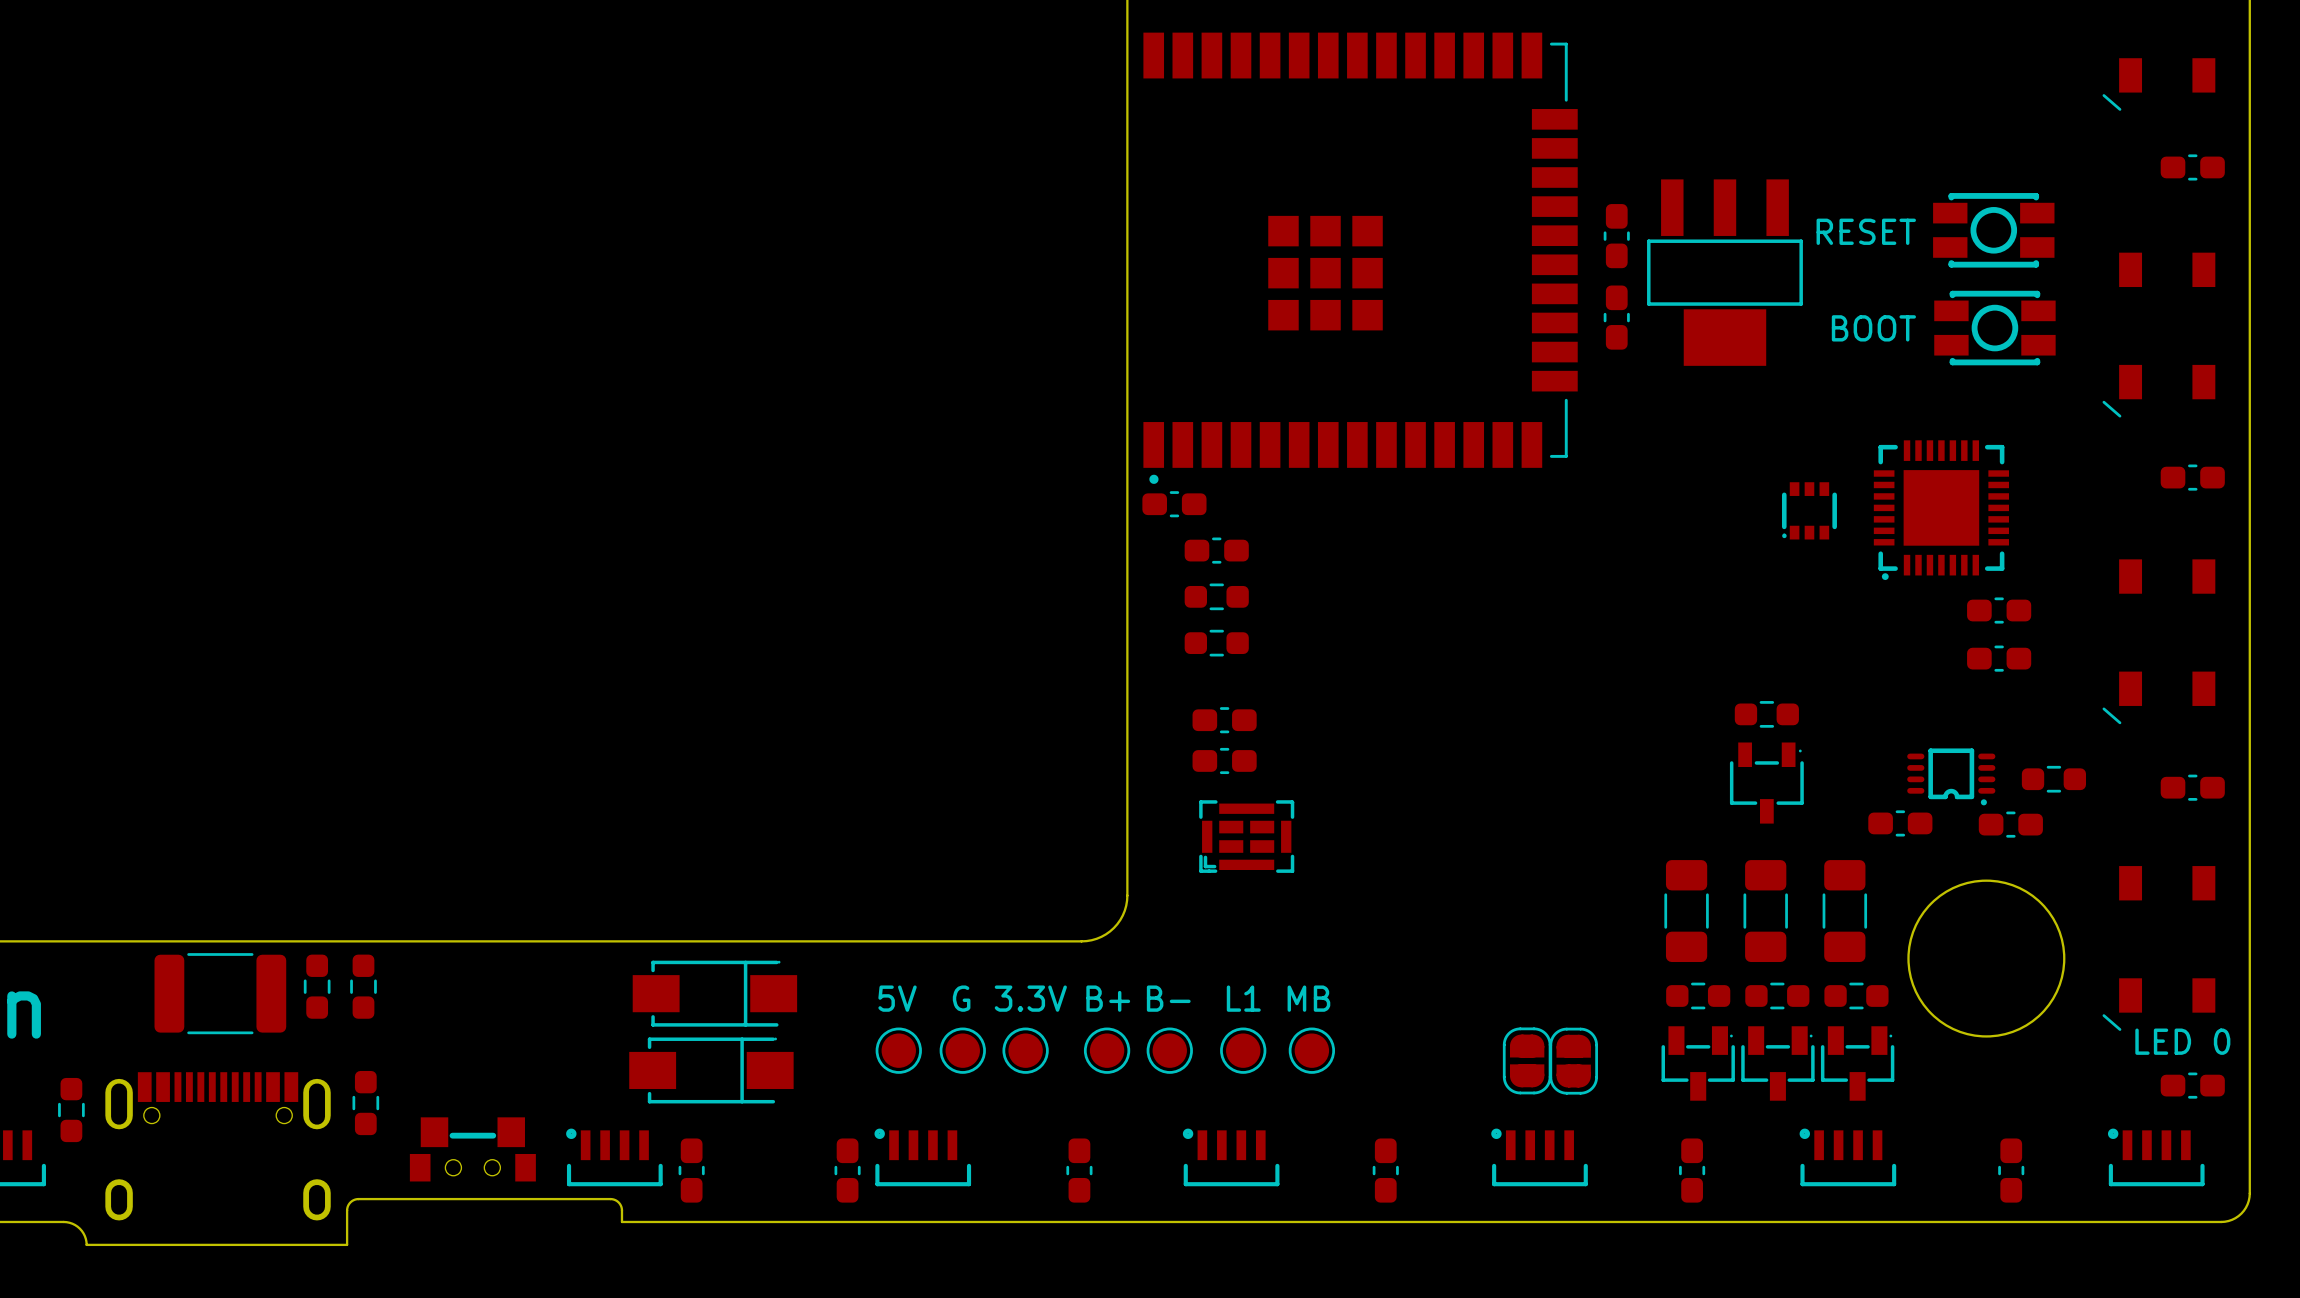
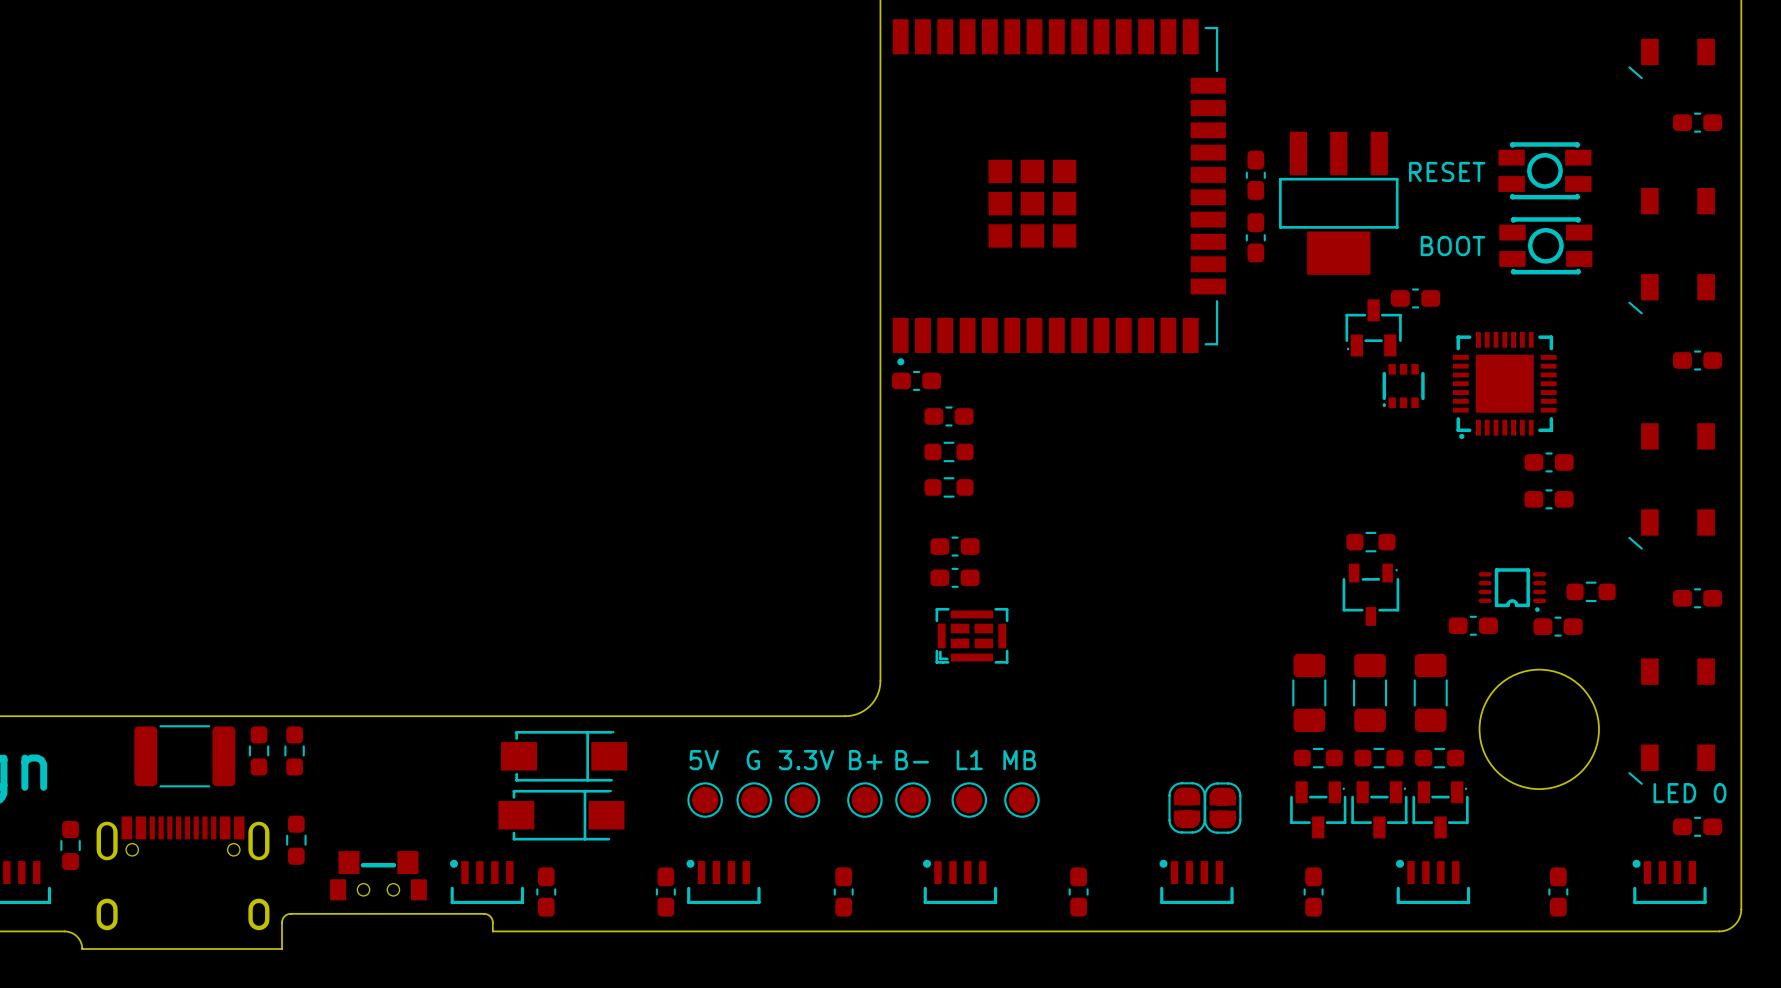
part: none -> (1415, 298)
part: none -> (1373, 327)

